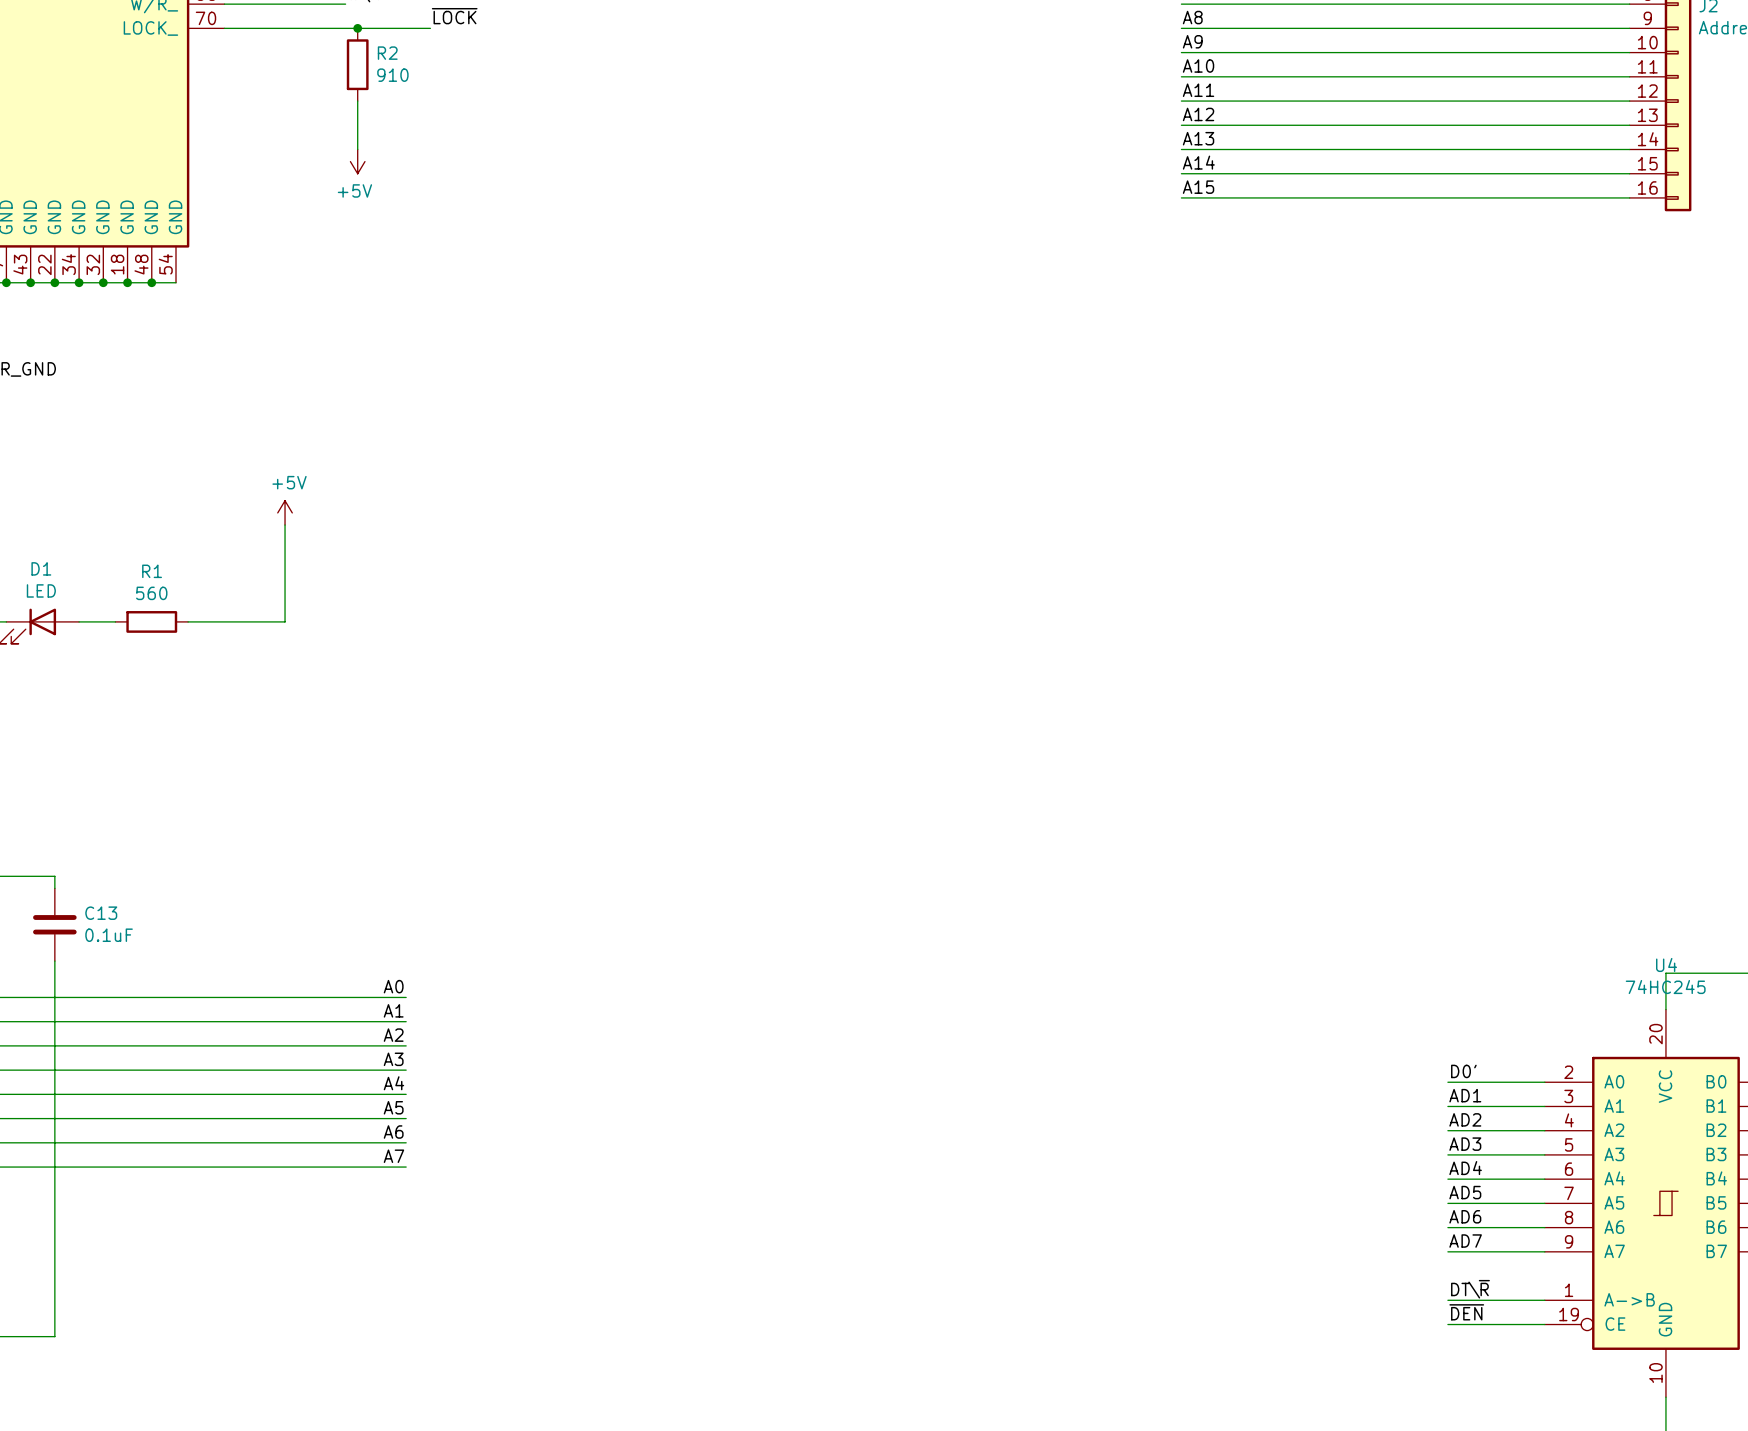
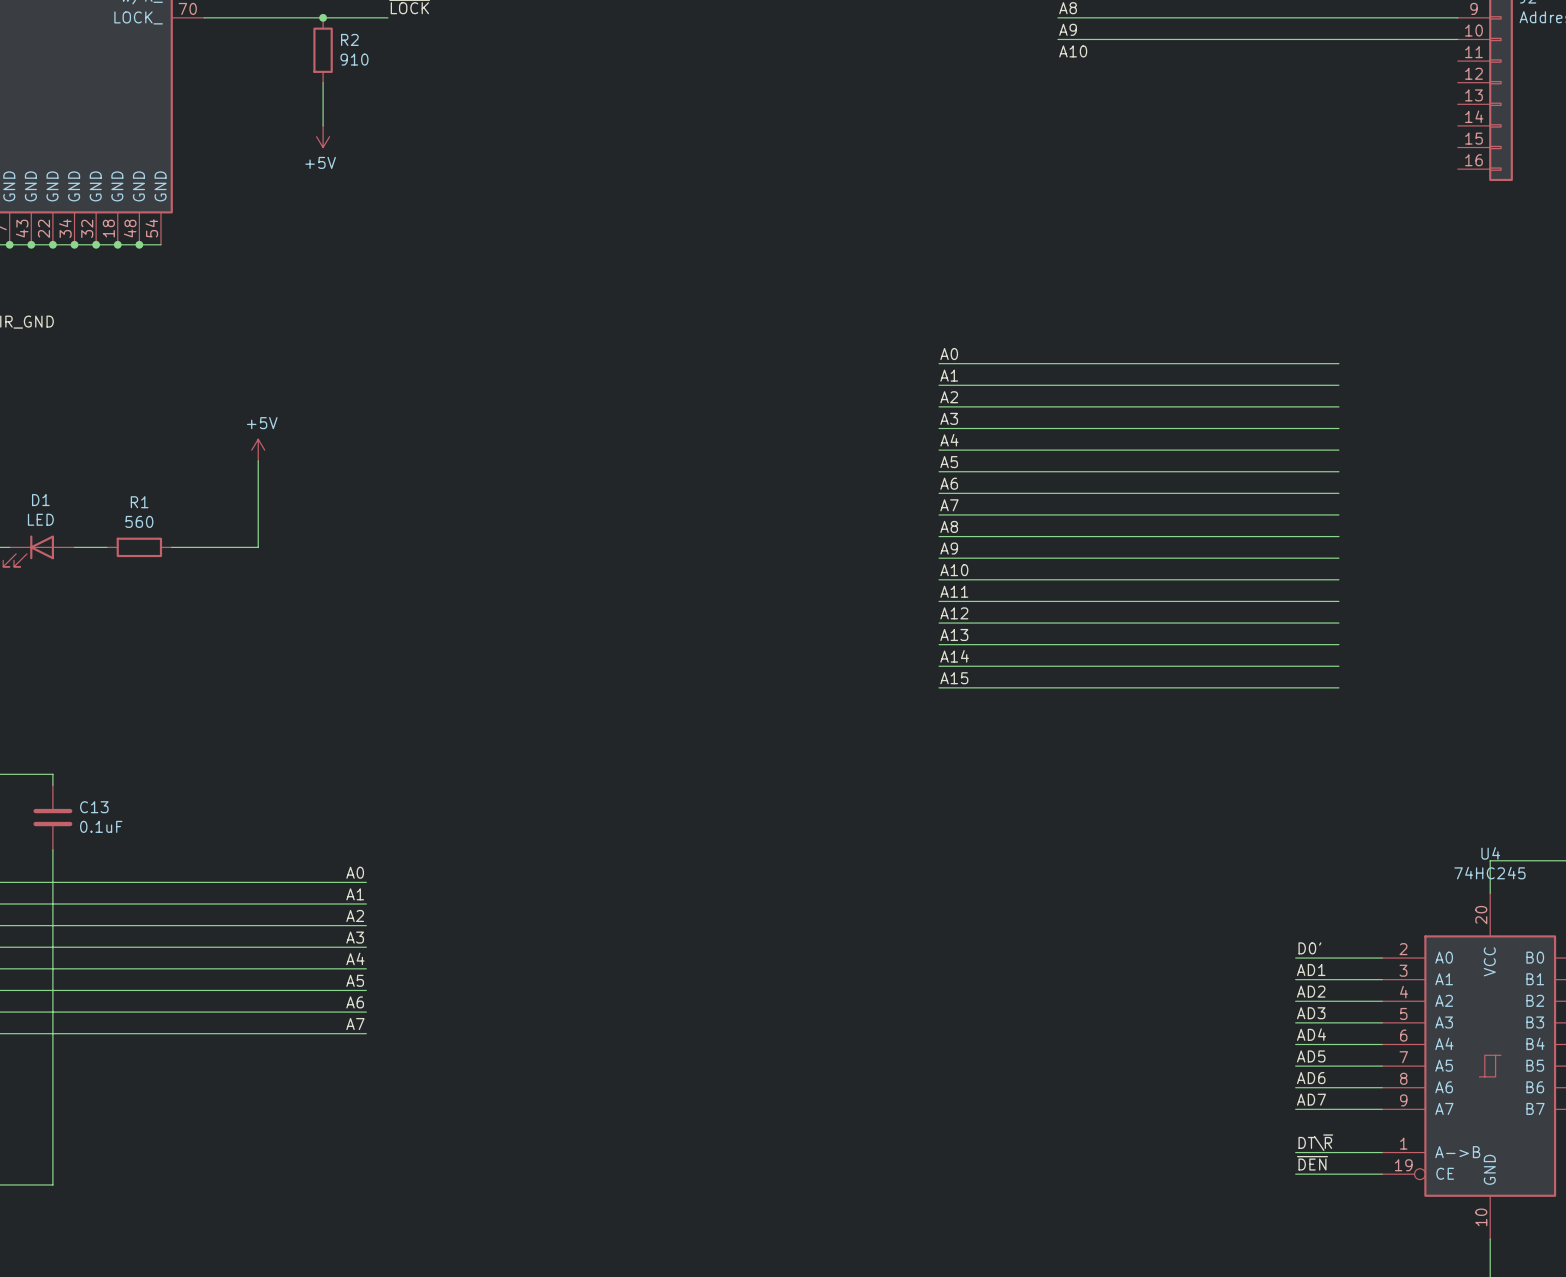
wire: (1181, 76) (1629, 76) -> none
label: A11 (1198, 90) -> none
wire: (1181, 101) (1629, 101) -> none
label: A12 (1198, 114) -> none
wire: (1181, 125) (1629, 125) -> none
label: A13 (1198, 138) -> none
wire: (1181, 149) (1629, 149) -> none
label: A14 (1198, 162) -> none
wire: (1181, 173) (1629, 173) -> none
label: A15 (1198, 187) -> none
wire: (1181, 197) (1629, 197) -> none
label: none -> A0 (949, 354)
wire: none -> (939, 363) (1338, 363)
label: none -> A1 (949, 375)
wire: none -> (939, 385) (1338, 385)
label: none -> A2 (949, 397)
wire: none -> (939, 406) (1338, 406)
label: none -> A3 (949, 418)
wire: none -> (939, 428) (1338, 428)
label: none -> A4 (949, 440)
wire: none -> (939, 450) (1338, 450)
label: none -> A5 (949, 462)
wire: none -> (939, 471) (1338, 471)
label: none -> A6 (949, 483)
wire: none -> (939, 493) (1338, 493)
label: none -> A7 (949, 505)
wire: none -> (939, 514) (1338, 514)
label: none -> A8 (949, 526)
wire: none -> (939, 536) (1338, 536)
label: none -> A9 (949, 548)
wire: none -> (939, 558) (1338, 558)
label: none -> A10 (954, 570)
wire: none -> (939, 579) (1338, 579)
label: none -> A11 (954, 591)
wire: none -> (939, 601) (1338, 601)
label: none -> A12 (954, 613)
wire: none -> (939, 623) (1338, 623)
label: none -> A13 (954, 634)
wire: none -> (939, 644) (1338, 644)
label: none -> A14 (954, 656)
wire: none -> (939, 666) (1338, 666)
label: none -> A15 (954, 678)
wire: none -> (939, 687) (1338, 687)

